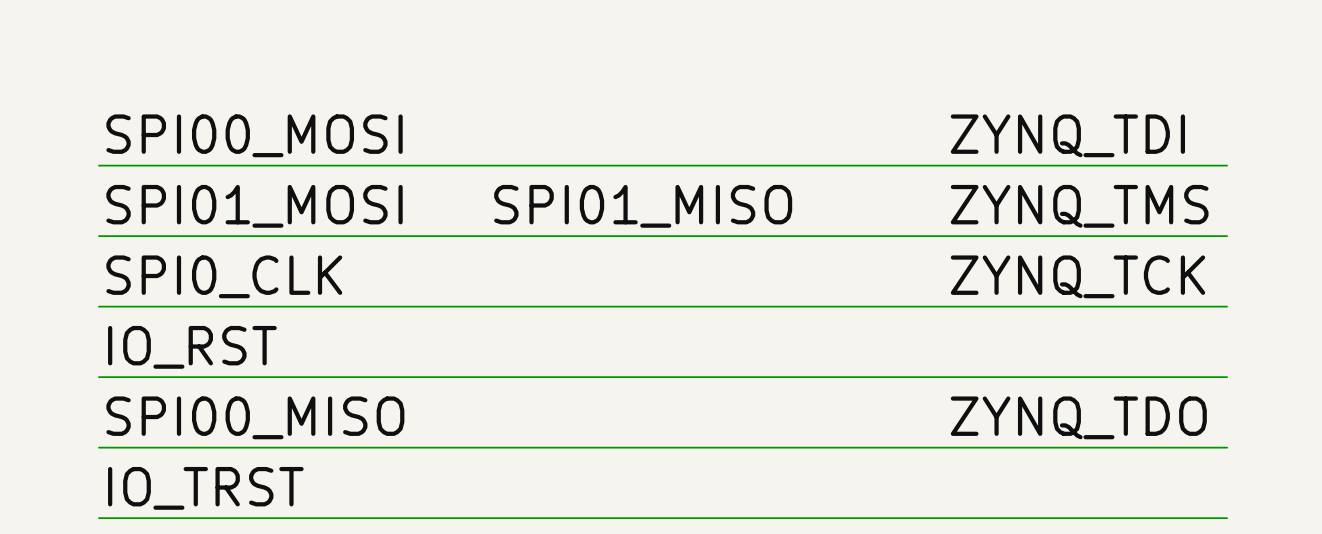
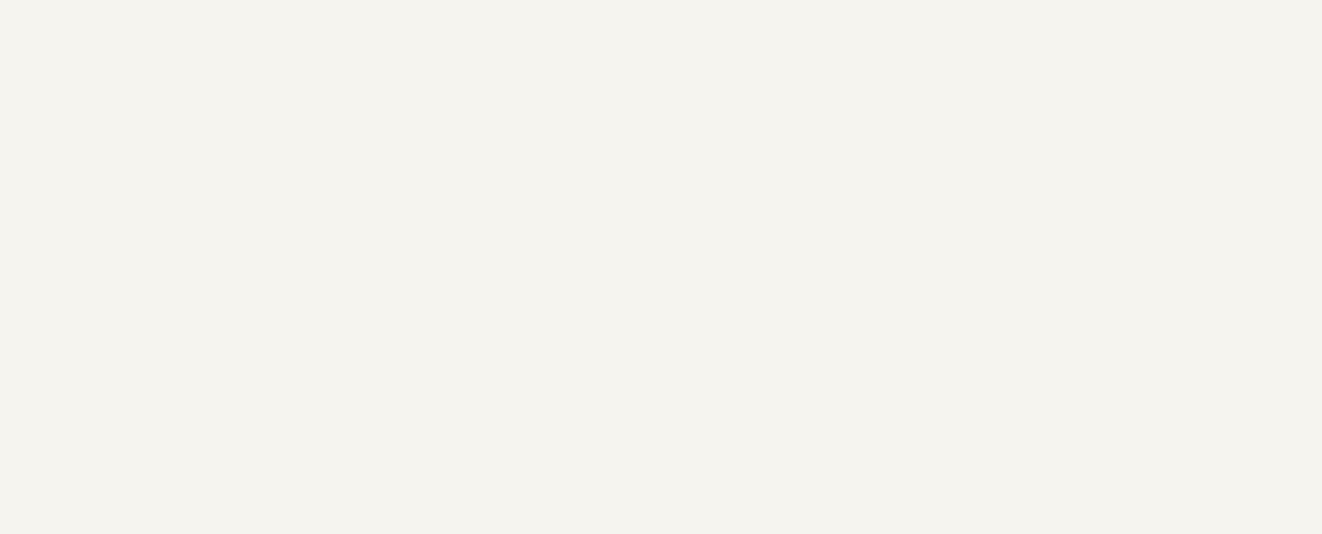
label: SPI00_MOSI (254, 135) -> none
label: ZYNQ_TDI (1067, 135) -> none
wire: (98, 165) (1227, 165) -> none
label: SPI01_MOSI (254, 206) -> none
label: SPI01_MISO (643, 206) -> none
label: ZYNQ_TMS (1079, 206) -> none
wire: (98, 236) (1227, 236) -> none
label: SPI0_CLK (224, 276) -> none
label: ZYNQ_TCK (1077, 276) -> none
wire: (98, 306) (1227, 306) -> none
label: IO_RST (192, 347) -> none
wire: (98, 377) (1227, 377) -> none
label: SPI00_MISO (255, 417) -> none
label: ZYNQ_TDO (1078, 417) -> none
wire: (98, 447) (1227, 447) -> none
label: IO_TRST (205, 488) -> none
wire: (98, 518) (1227, 518) -> none

